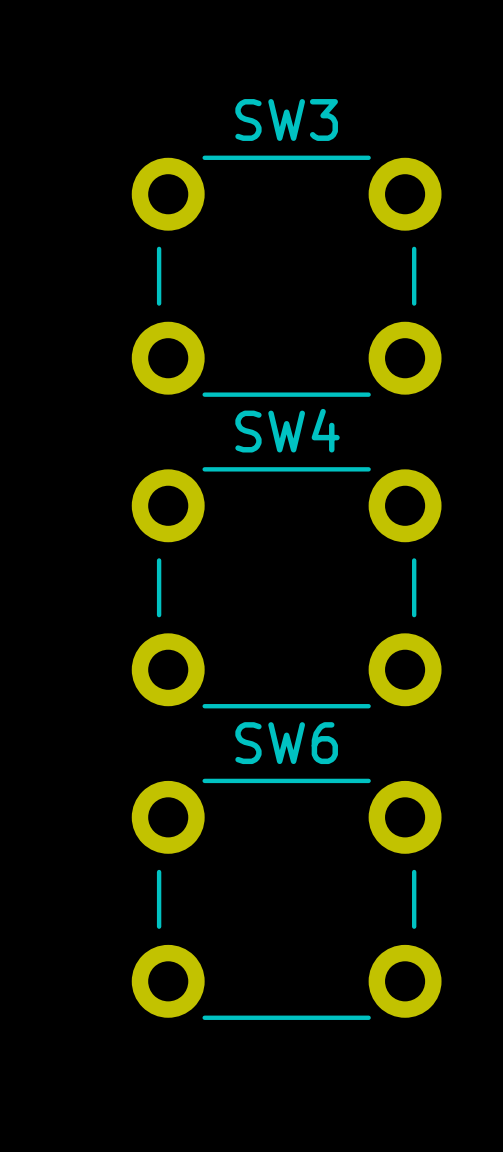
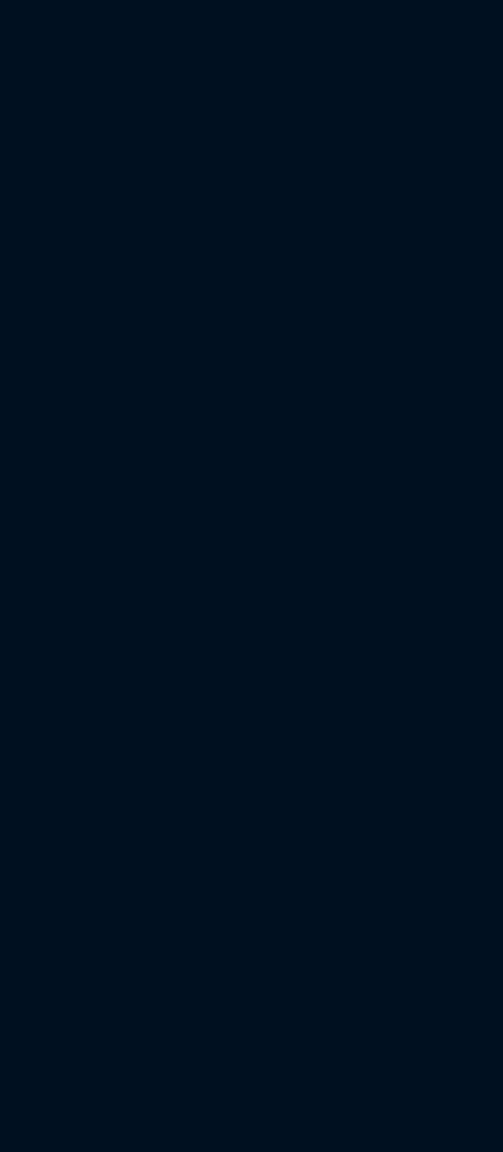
SW3: (286, 276) -> none
SW4: (286, 587) -> none
SW6: (286, 899) -> none

